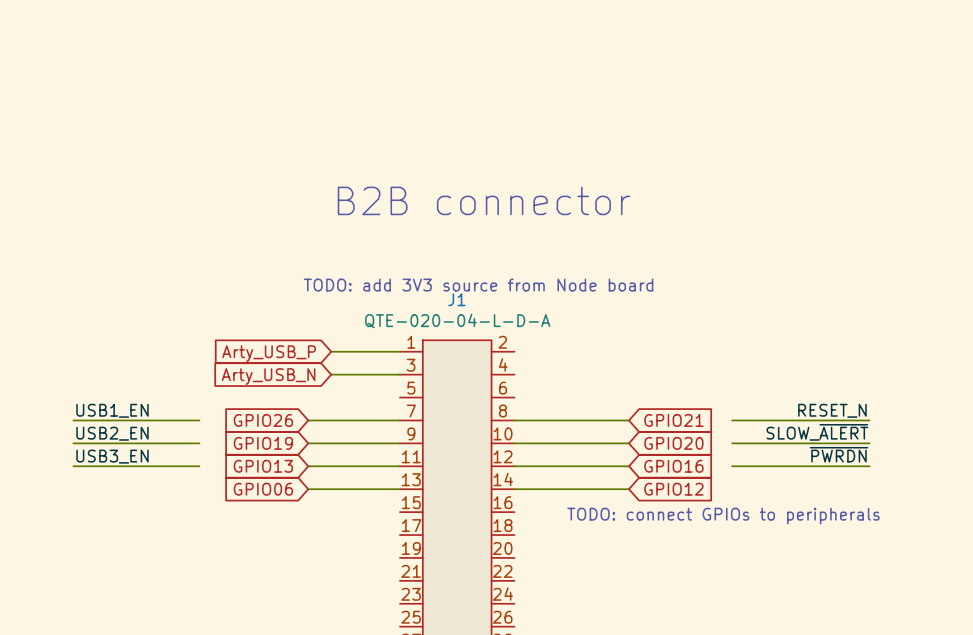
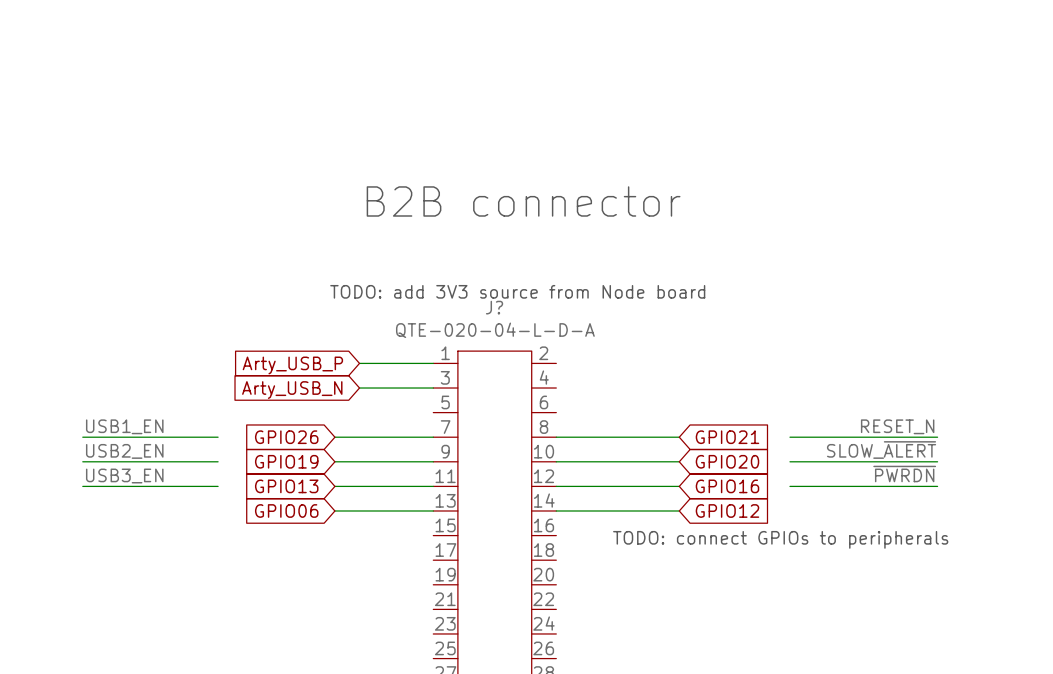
J1 name: J1 (456, 299) -> J? (494, 307)

